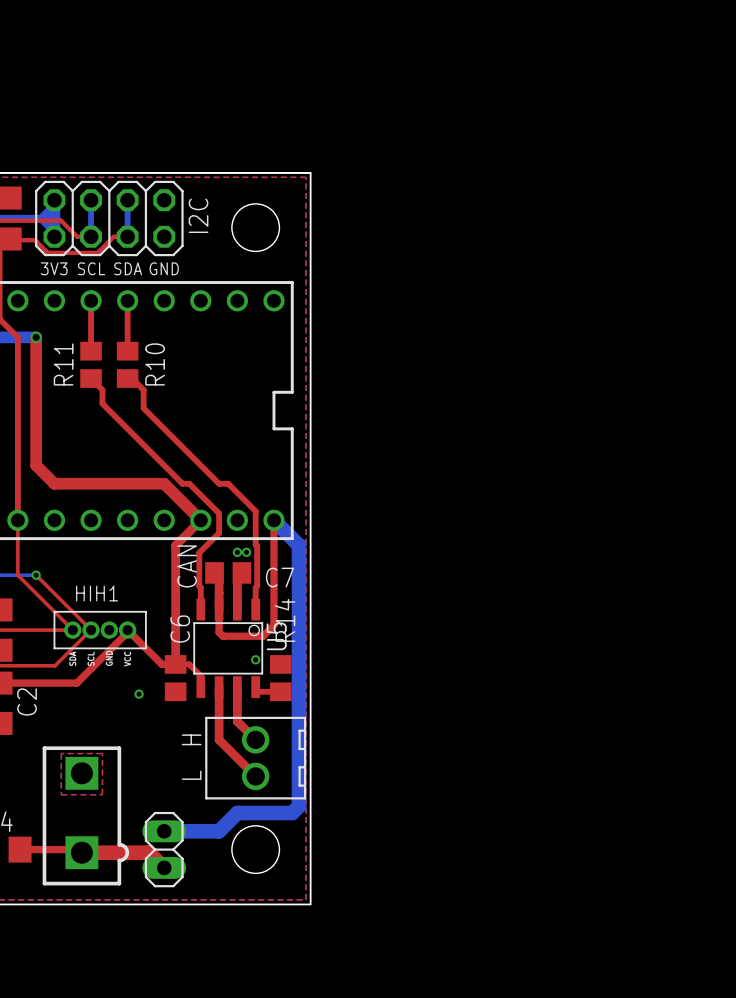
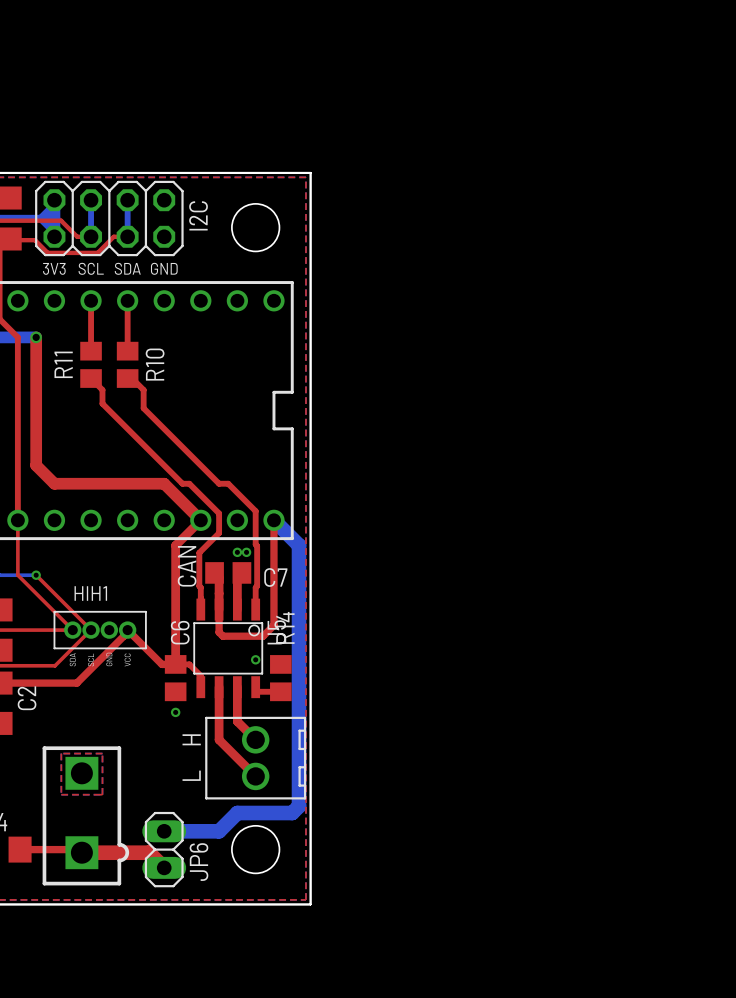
via position: (139, 694) -> (175, 712)
JP6 name: none -> JP6 (198, 862)

